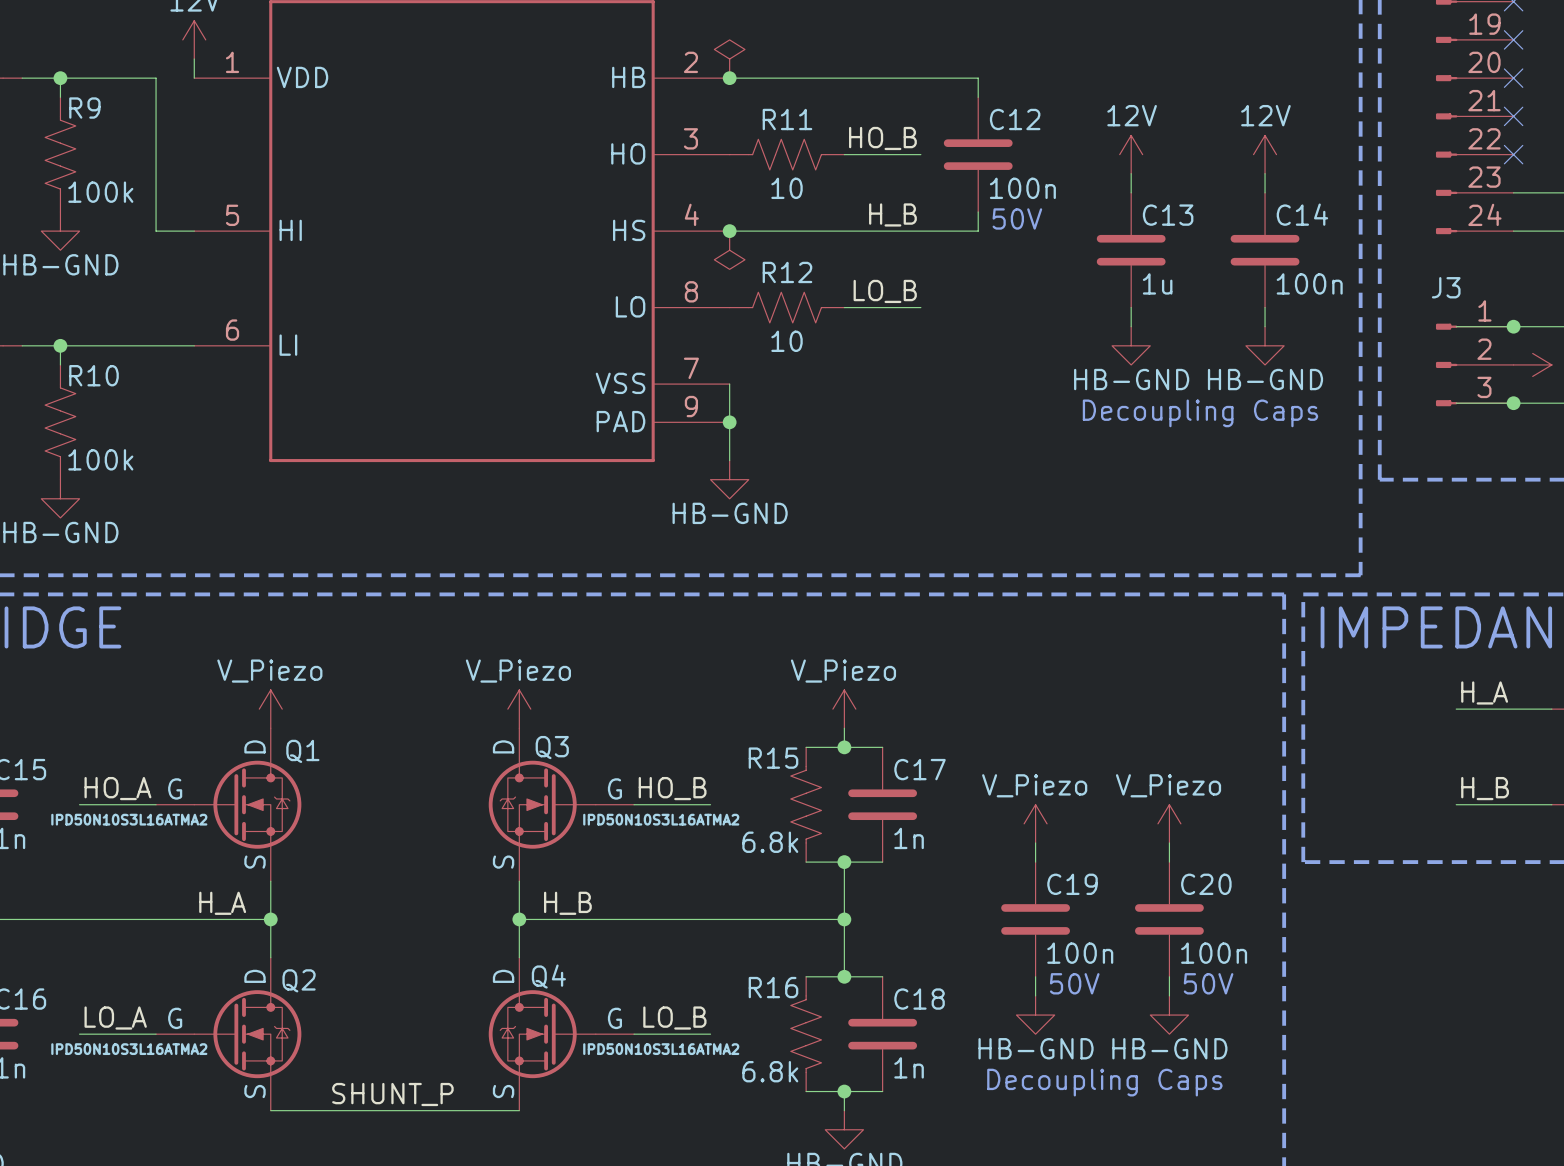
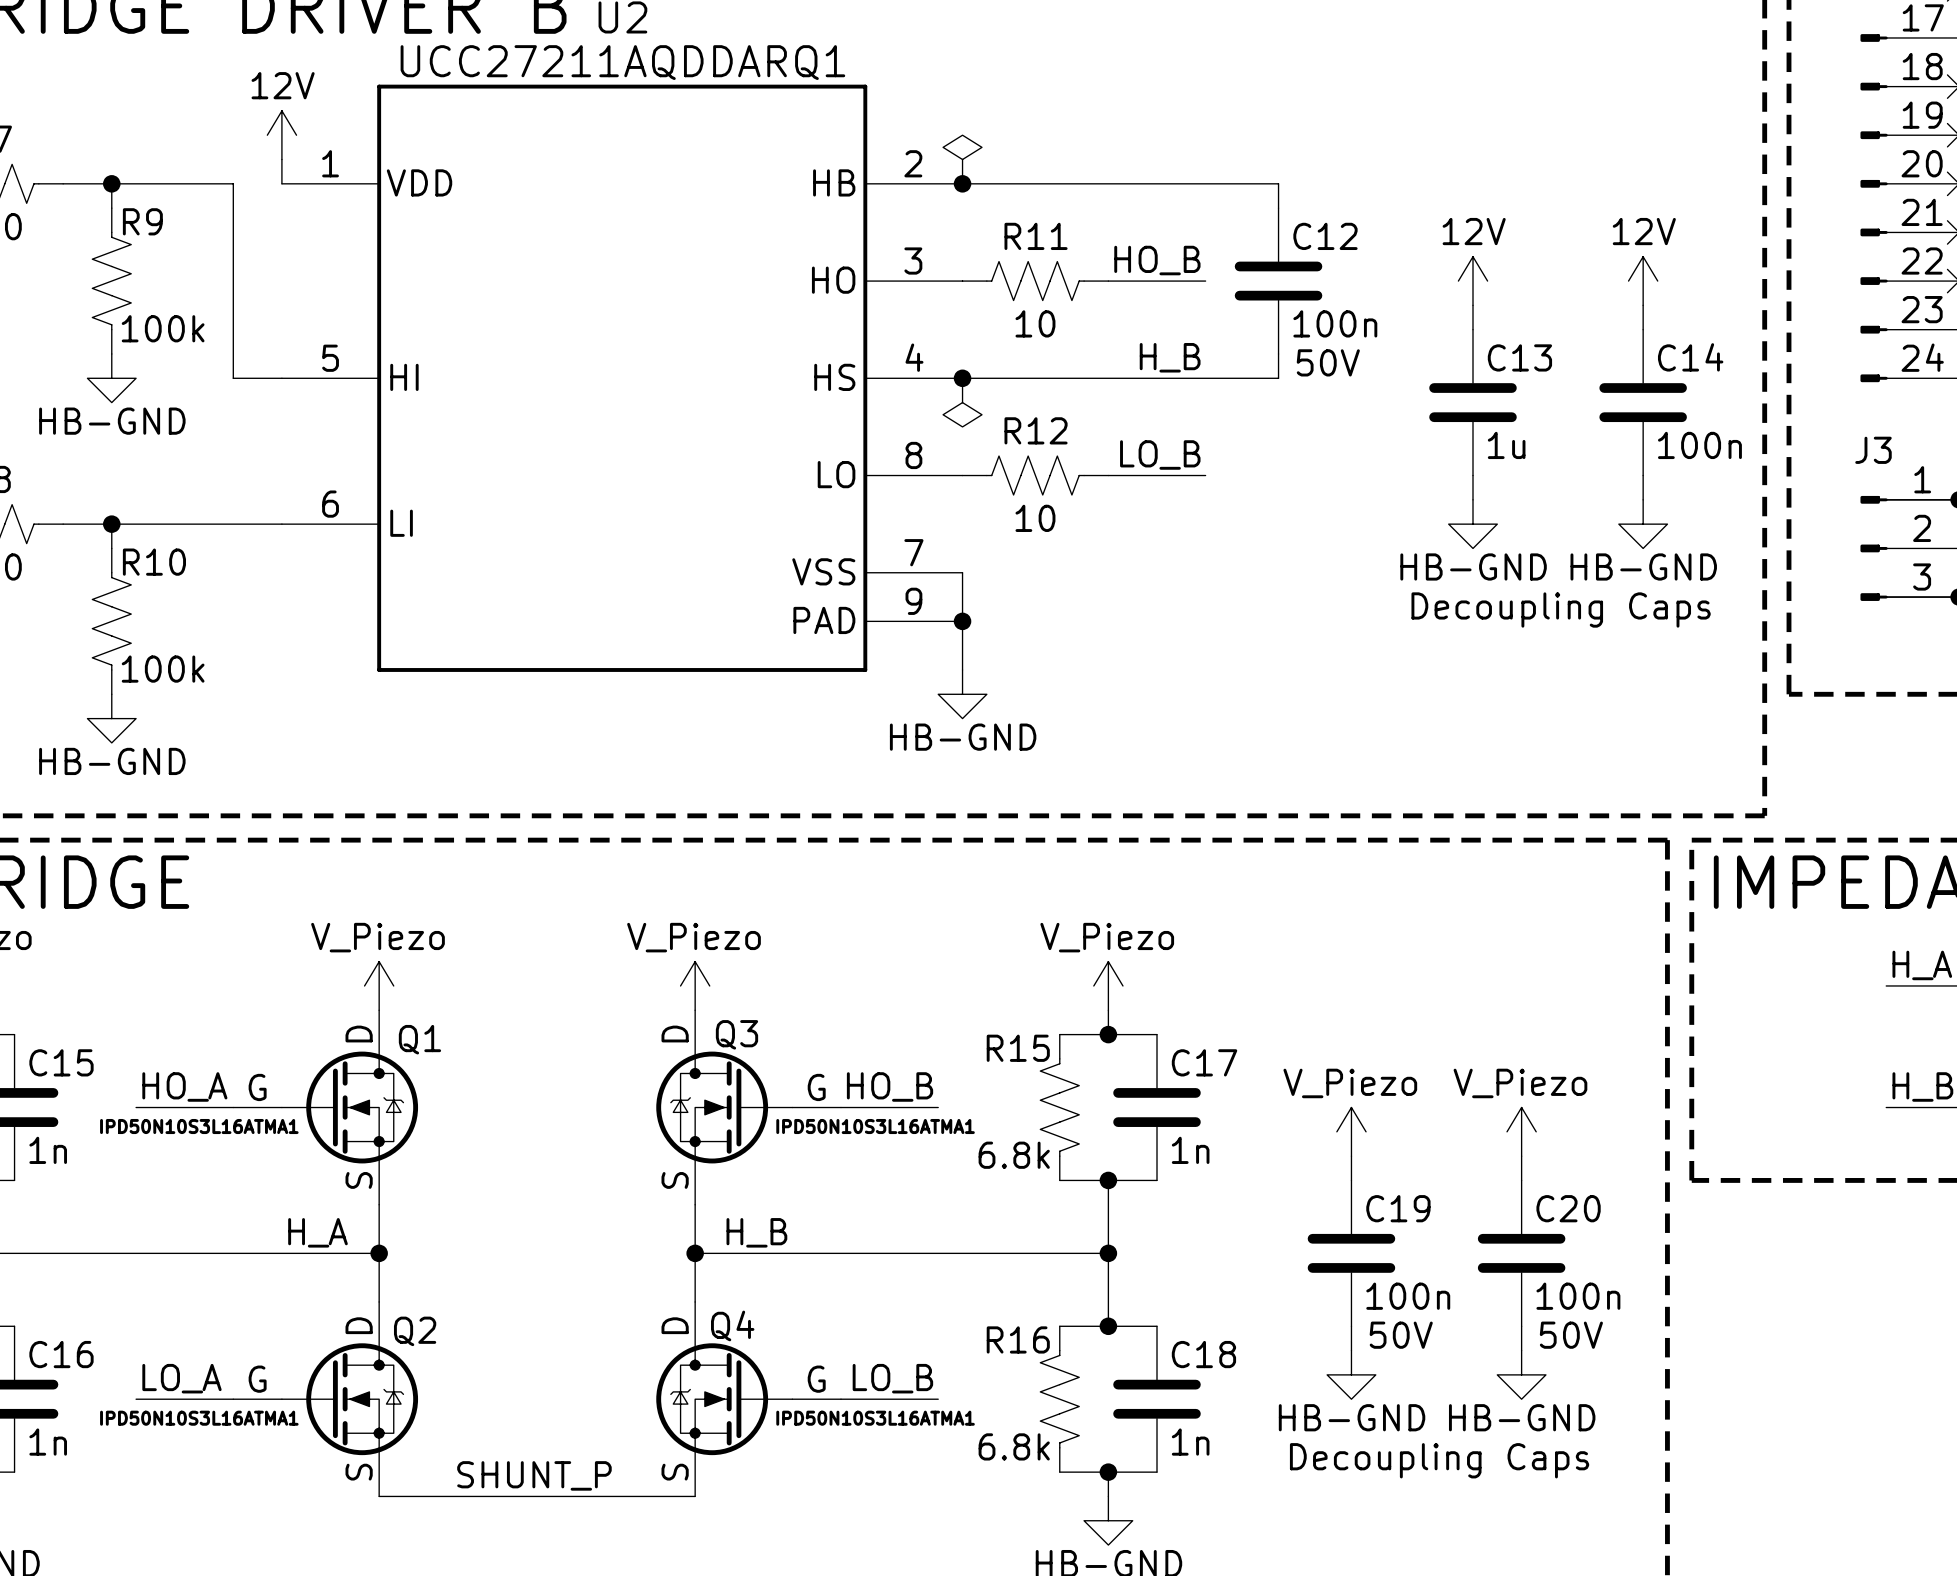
Q1 value: IPD50N10S3L16ATMA2 (129, 819) -> IPD50N10S3L16ATMA1 (199, 1126)
Q3 value: IPD50N10S3L16ATMA2 (661, 819) -> IPD50N10S3L16ATMA1 (875, 1126)
Q2 value: IPD50N10S3L16ATMA2 (129, 1049) -> IPD50N10S3L16ATMA1 (199, 1418)
Q4 value: IPD50N10S3L16ATMA2 (661, 1049) -> IPD50N10S3L16ATMA1 (875, 1418)

